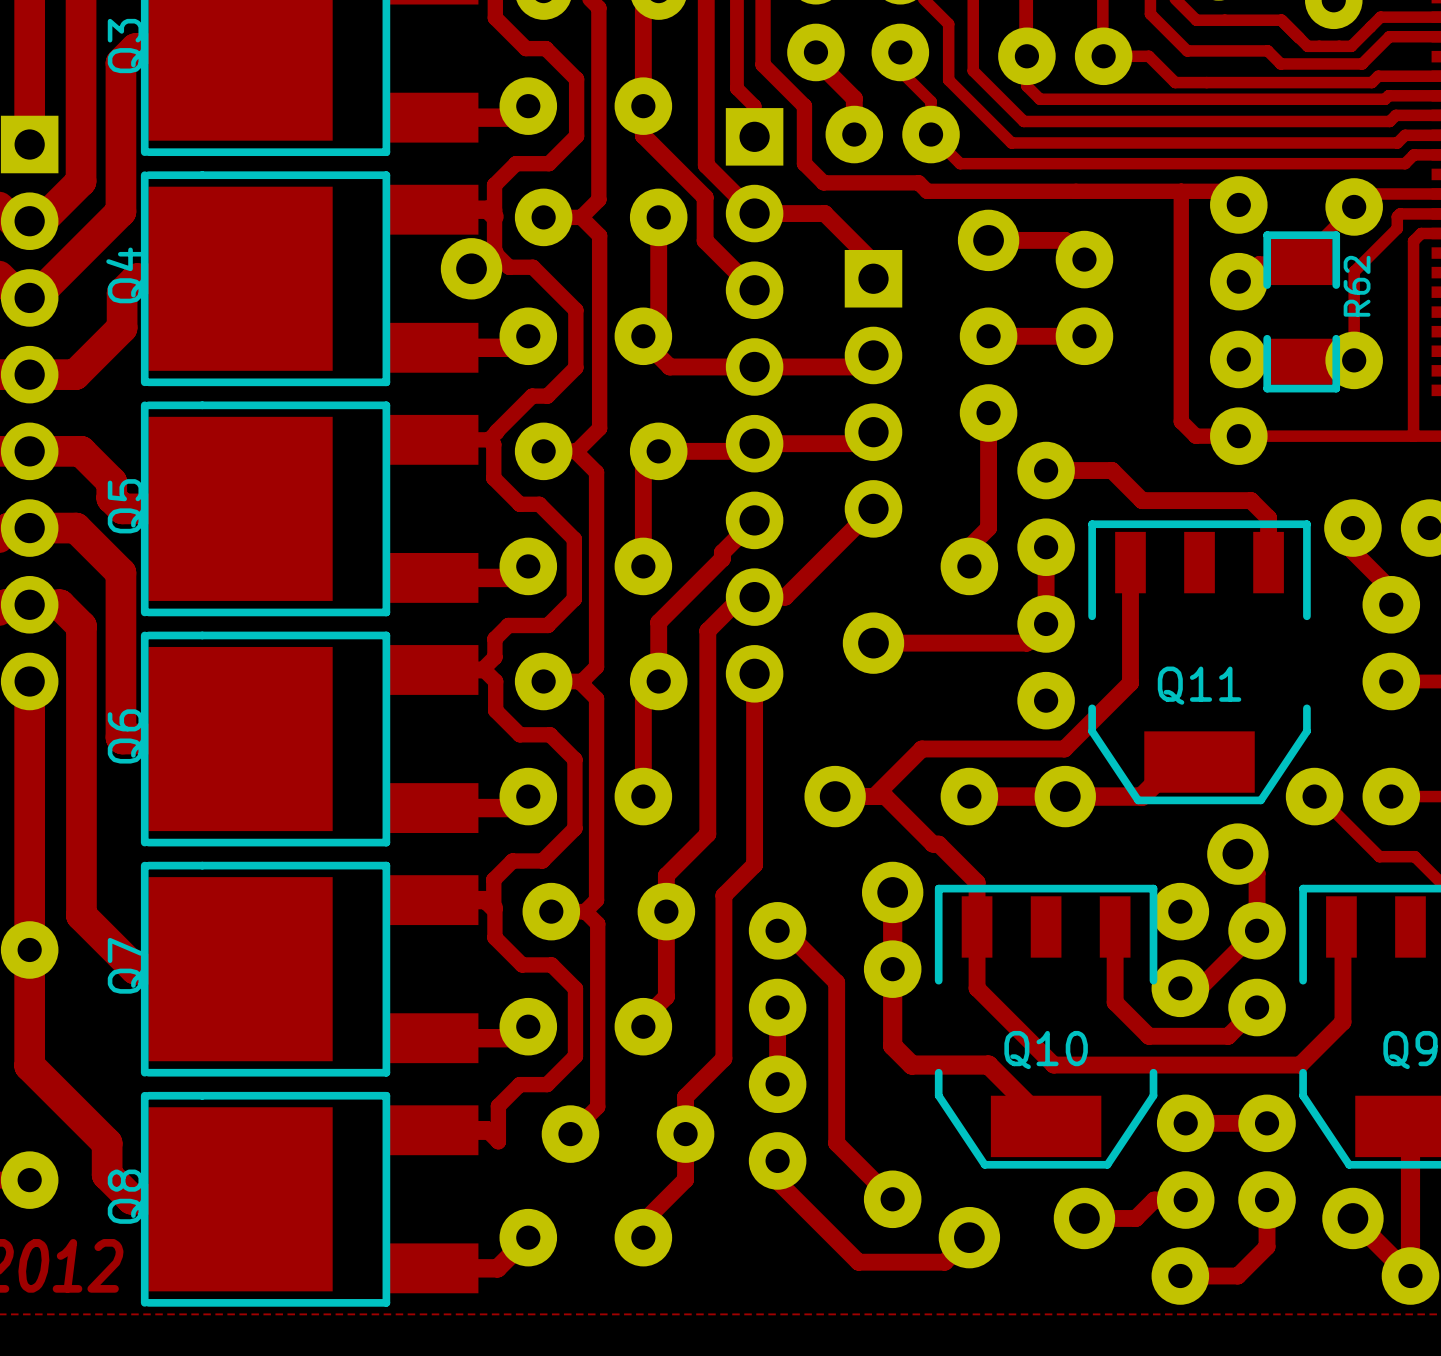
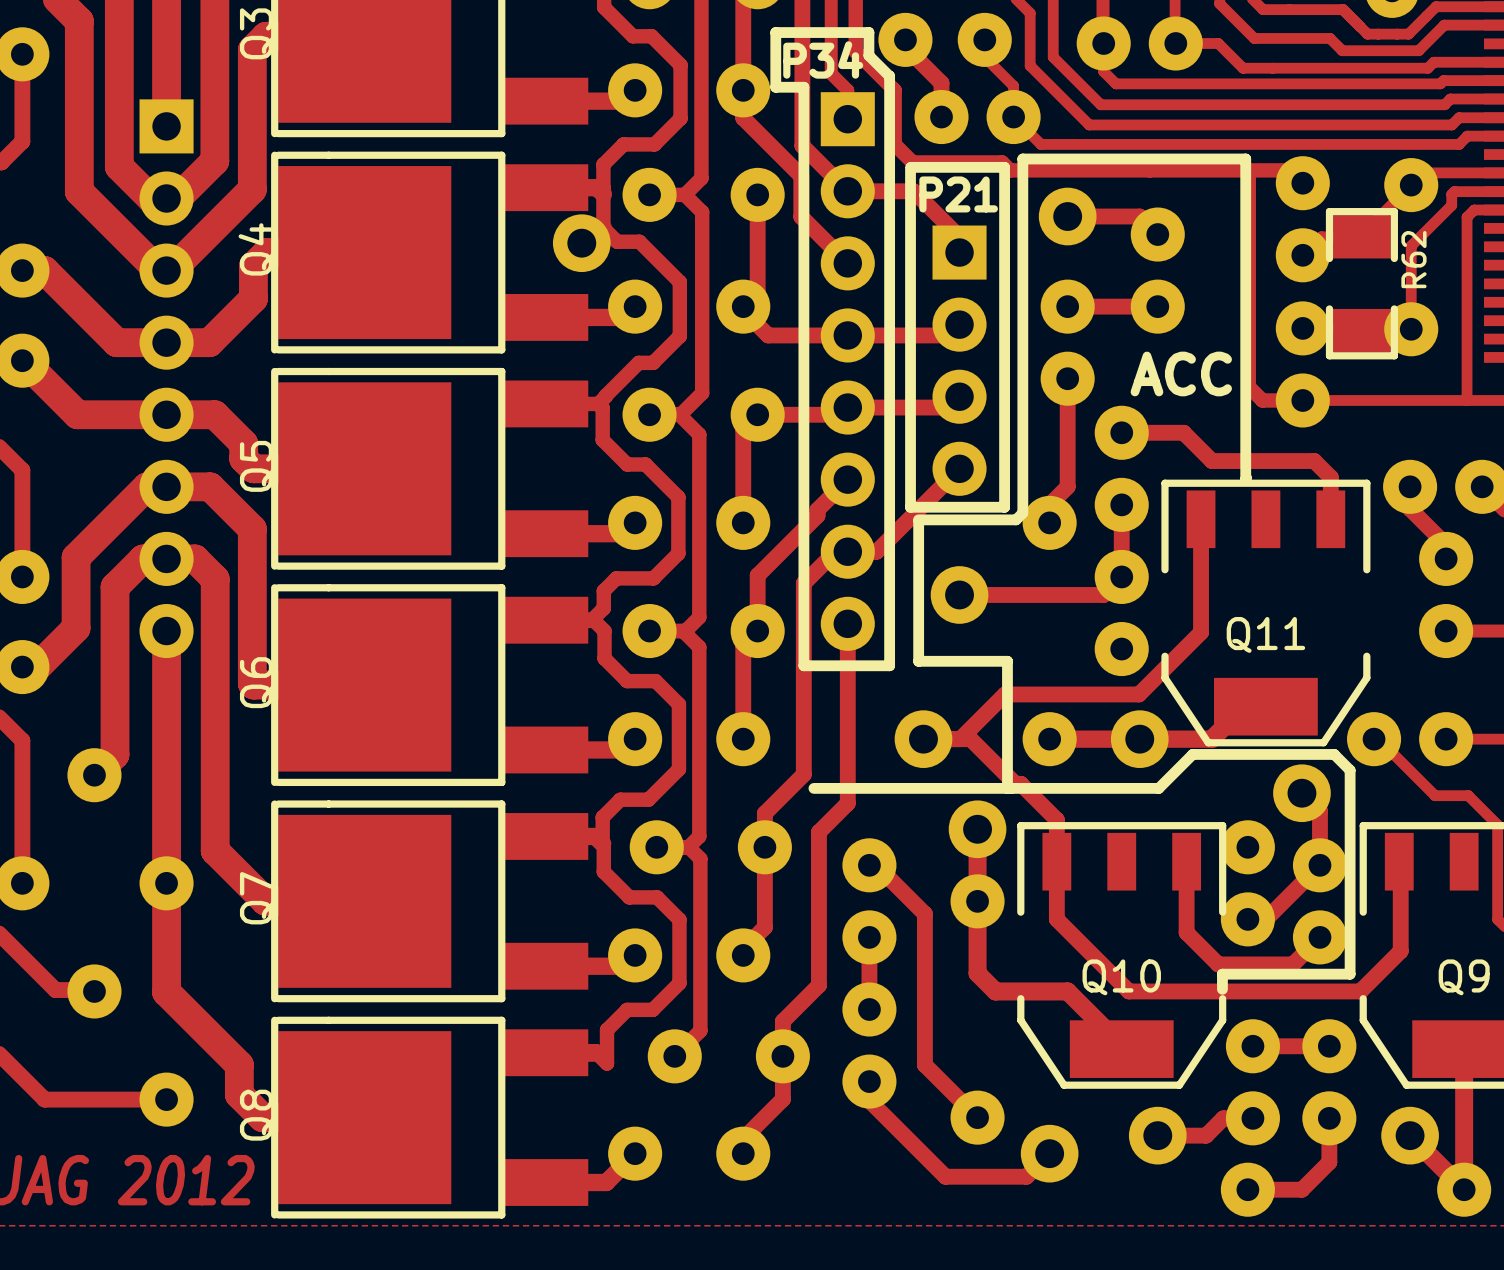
text: none -> P34 (823, 59)
line: none -> (889, 76) (889, 665) (803, 665) (803, 87) (775, 87) (775, 32) (868, 32) (868, 55) (889, 77)
line: none -> (910, 167) (910, 507) (1004, 507) (1004, 167) (911, 168)
text: none -> P21 (958, 194)
text: none -> ACC (1181, 373)
line: none -> (1246, 478) (1245, 158) (1022, 158) (1022, 513) (1016, 519) (918, 519)
line: none -> (918, 521) (918, 661) (1007, 661) (1007, 788)
line: none -> (813, 788) (1158, 788) (1192, 754) (1334, 754) (1350, 770) (1350, 974) (1222, 974) (1222, 989)

